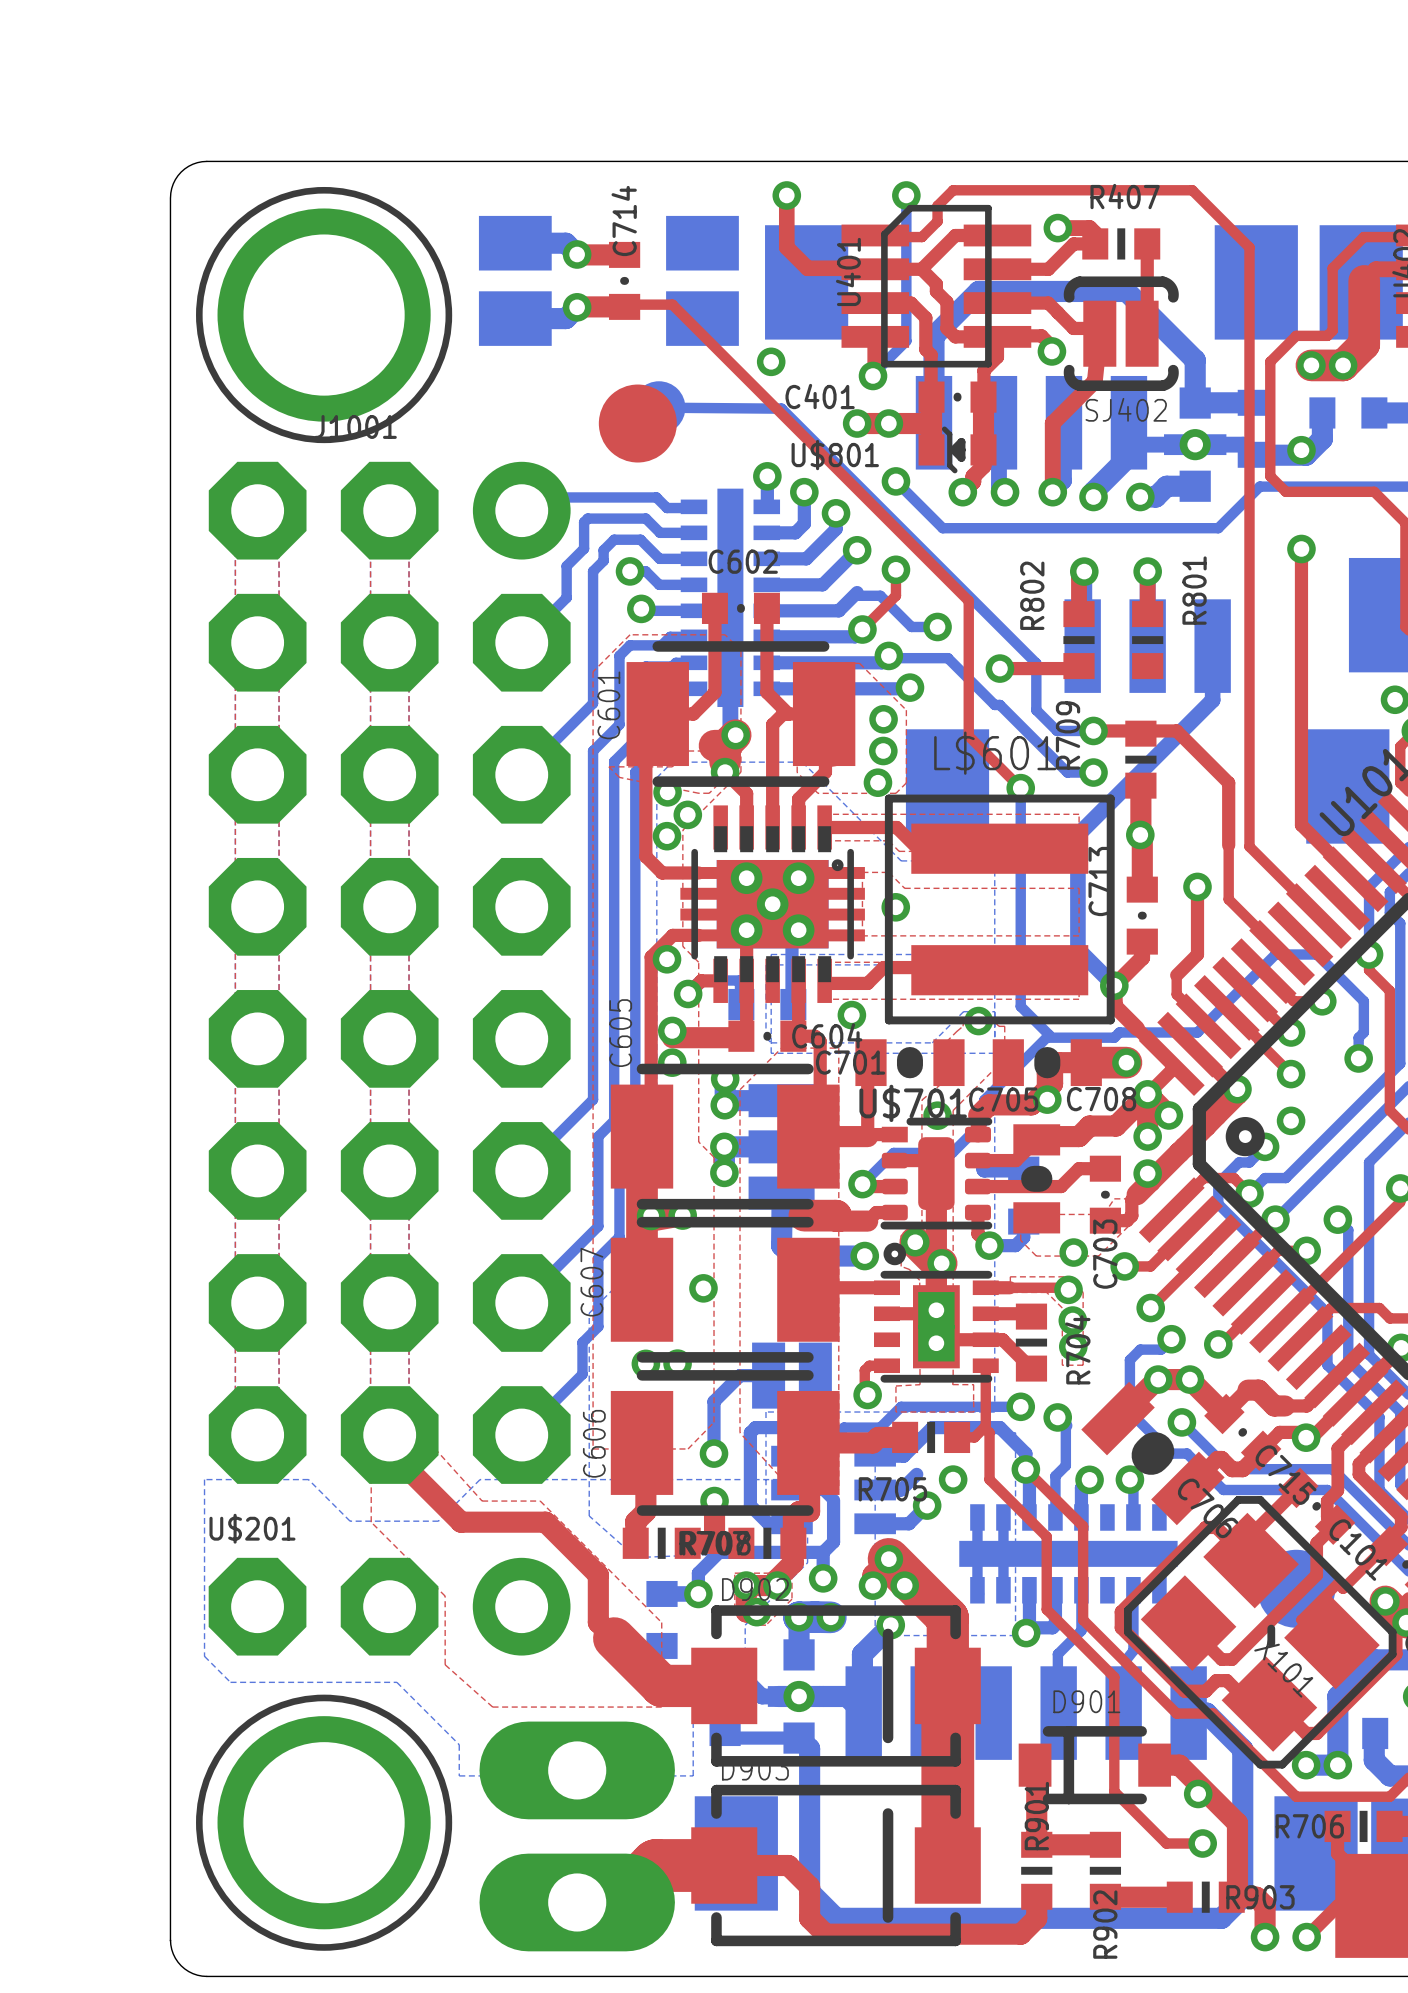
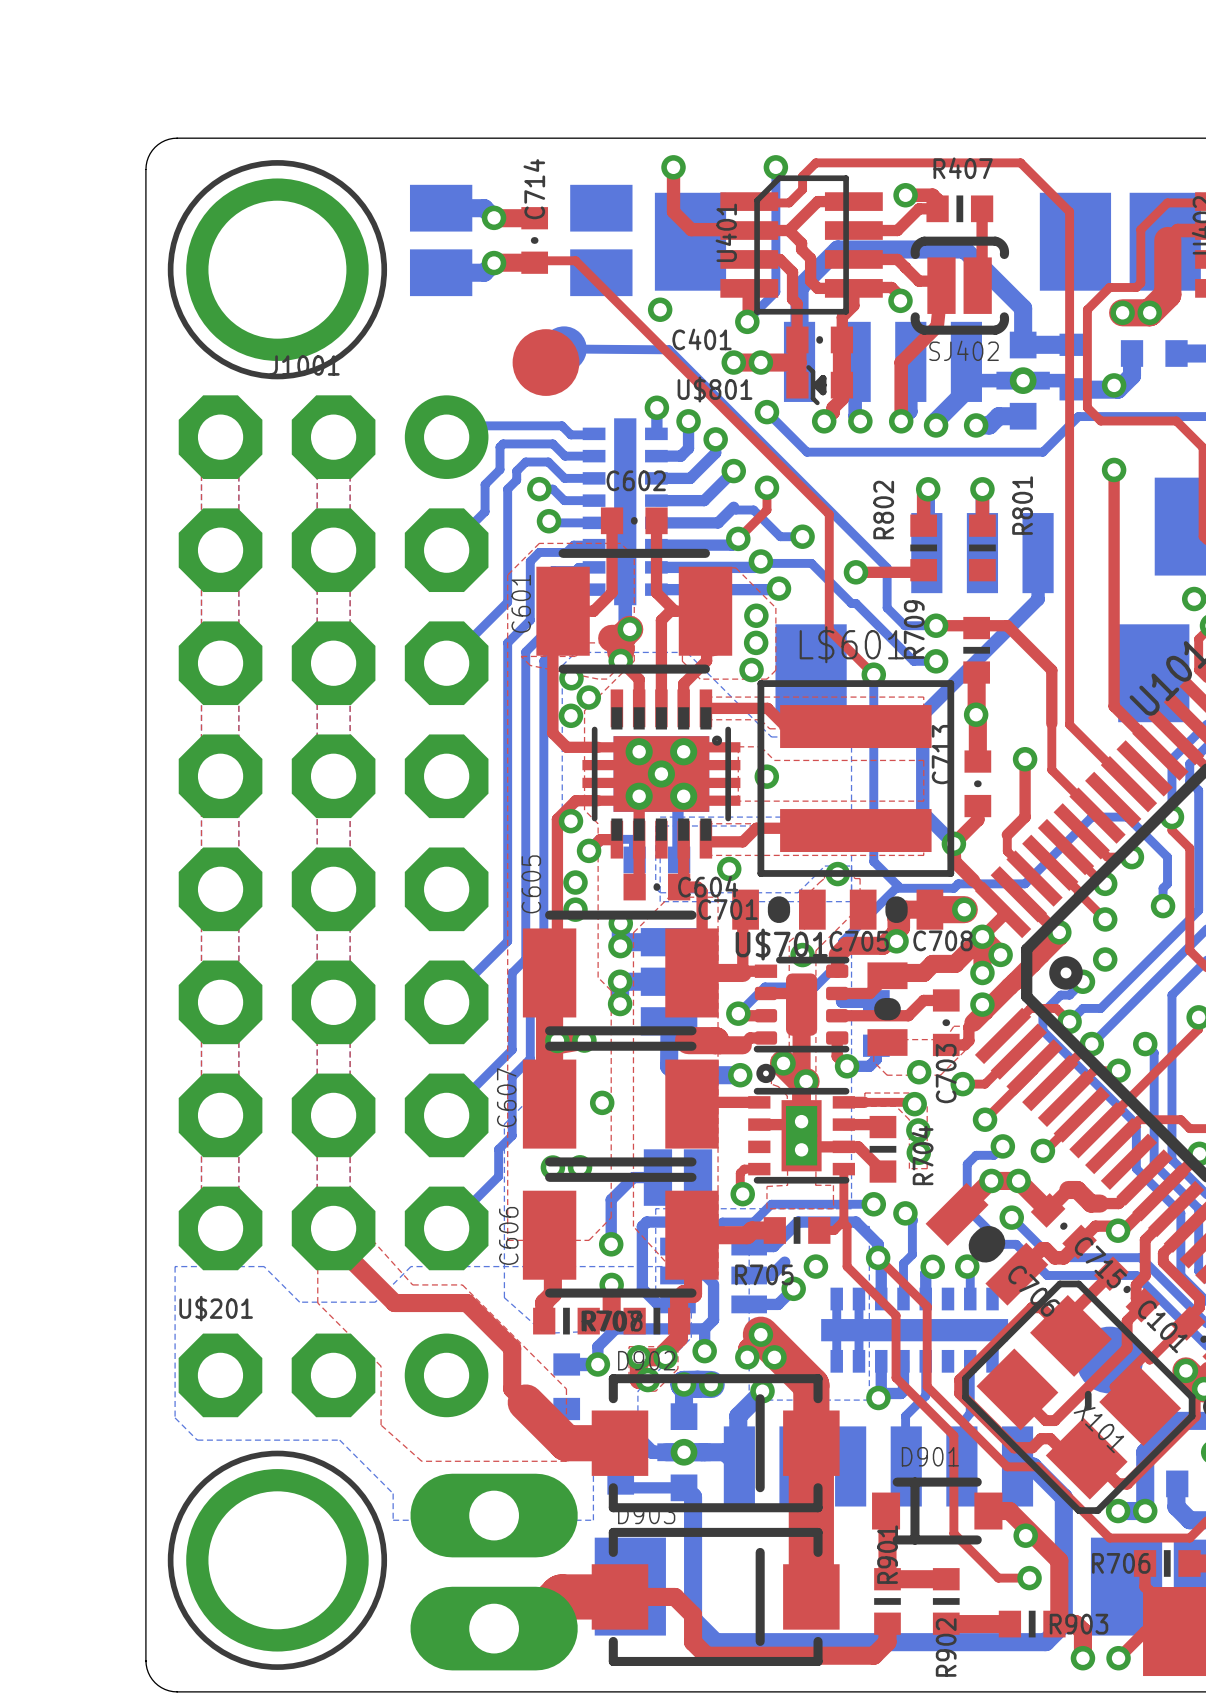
top track: (672, 1037) (740, 1037) -> none

